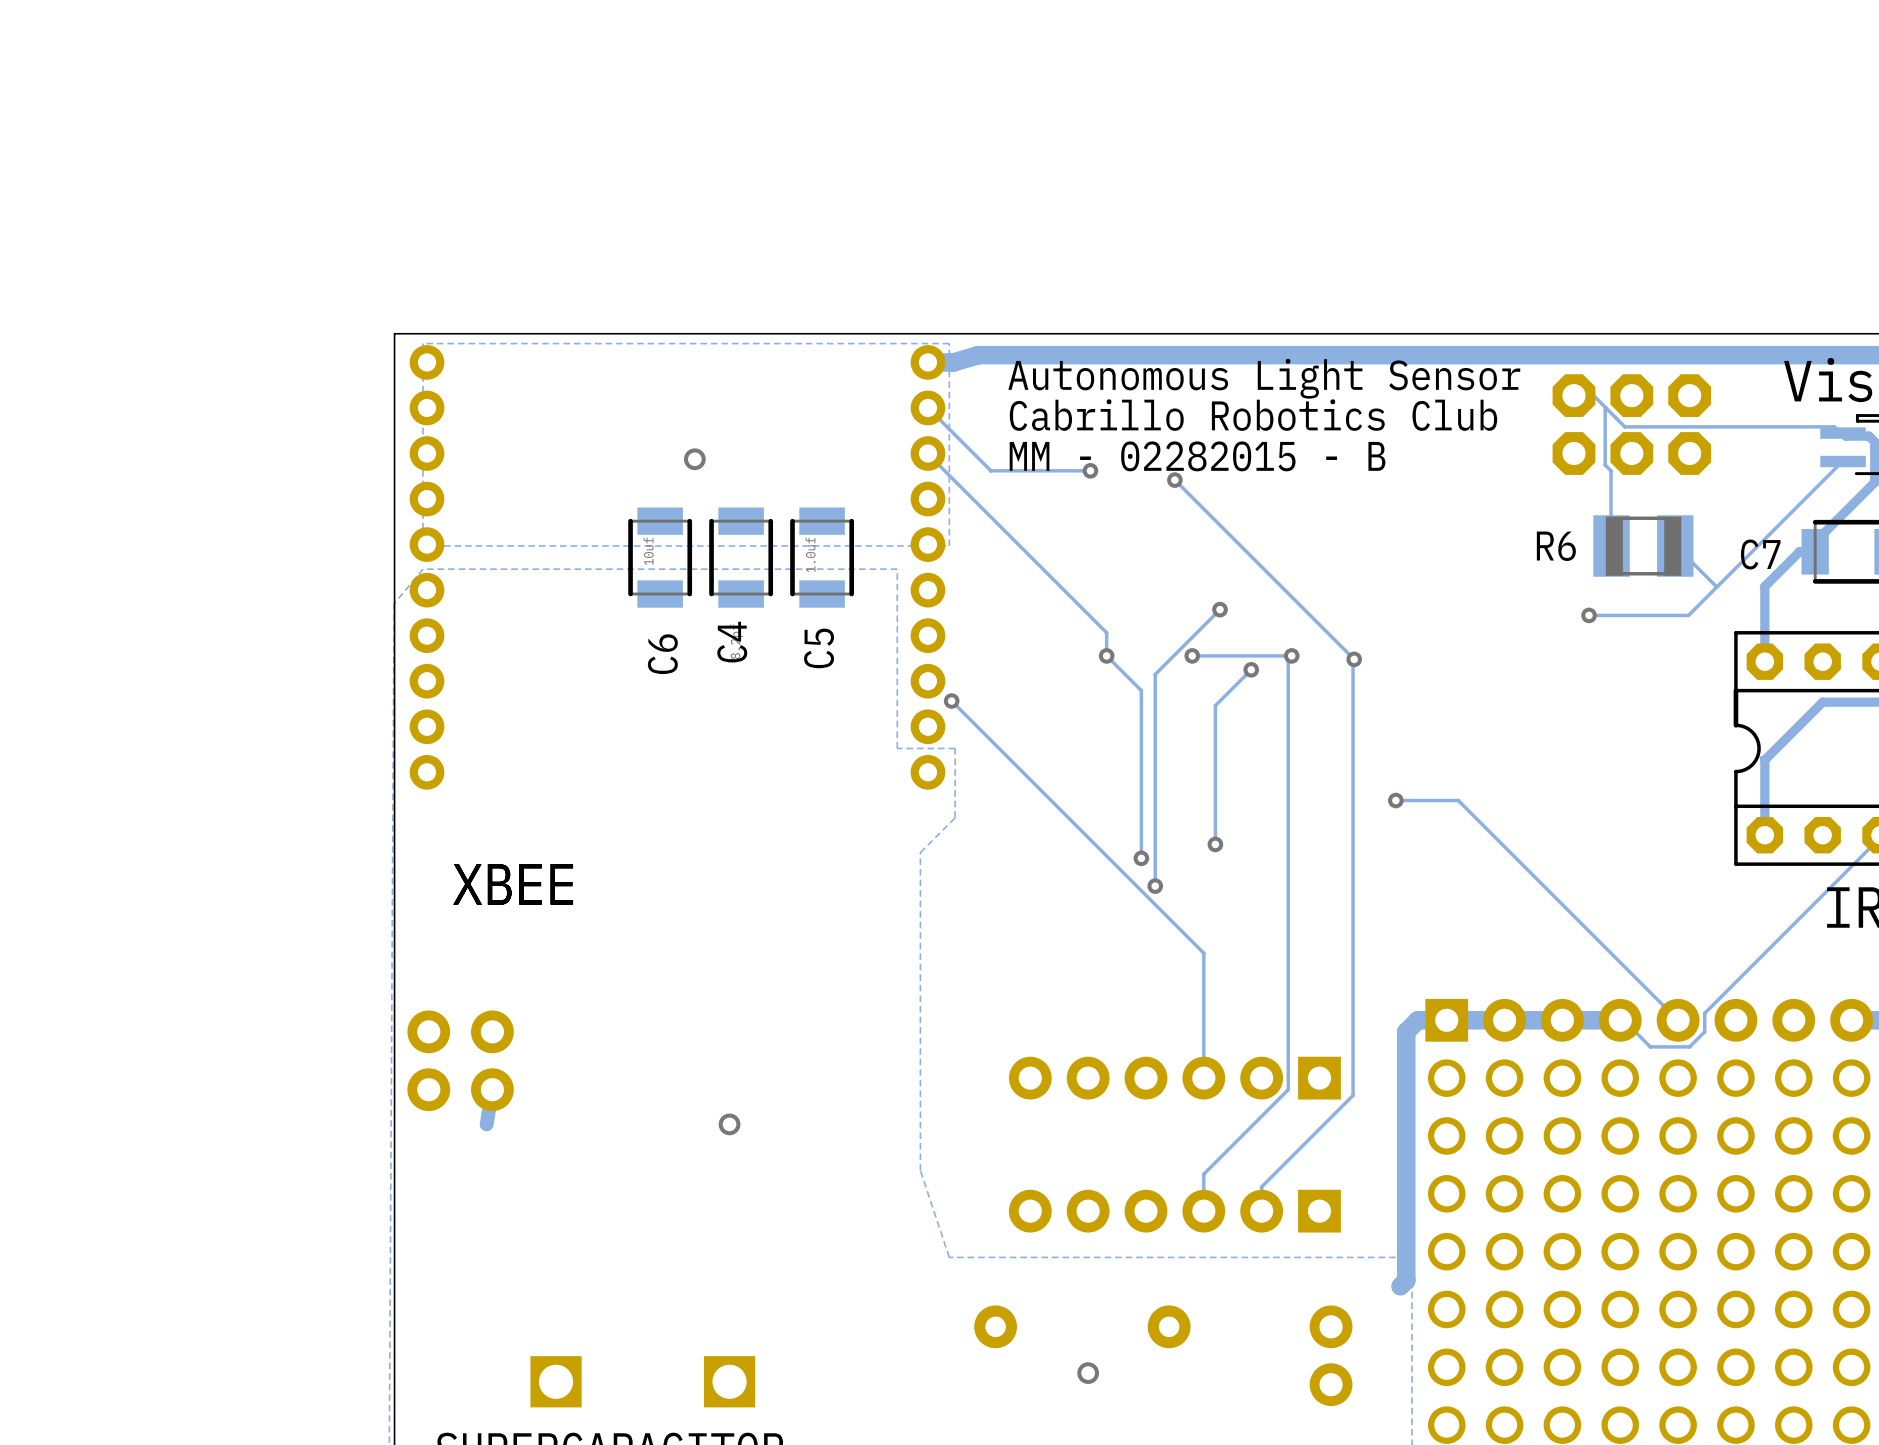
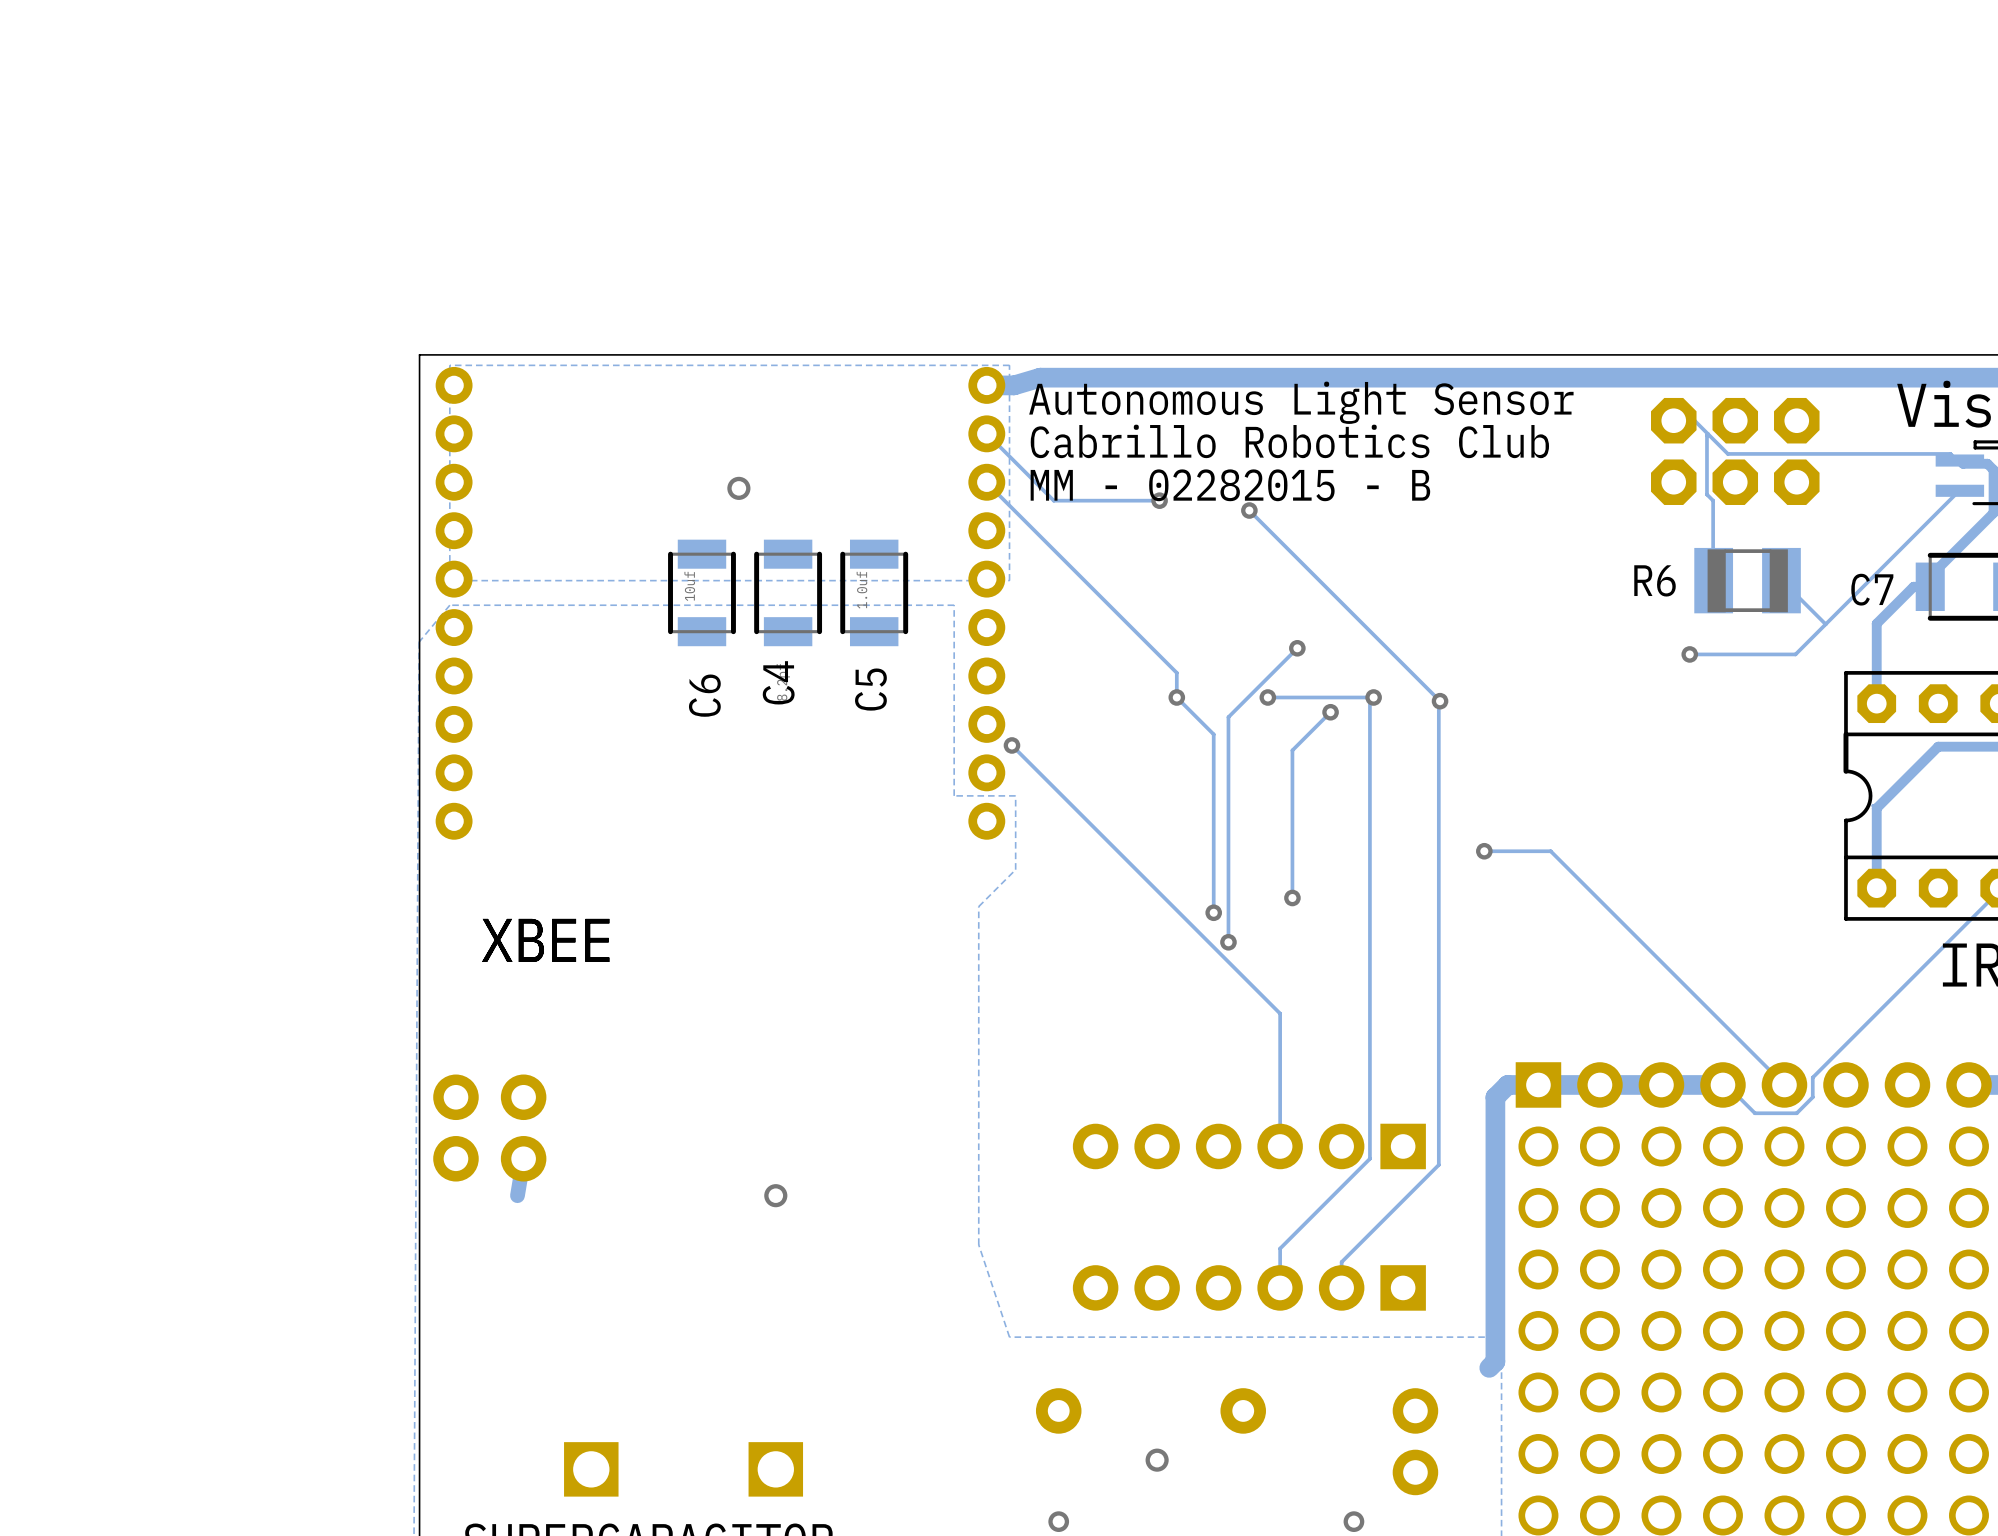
text position: Autonomous Light Sensor (1264, 378) -> Autonomous Light Sensor (1301, 402)
text position: Cabrillo Robotics Club (1253, 415) -> Cabrillo Robotics Club (1289, 441)
text position: MM - 02282015 - B (1197, 456) -> MM - 02282015 - B (1230, 485)
via: none -> (1058, 1521)
via: none -> (1353, 1521)

